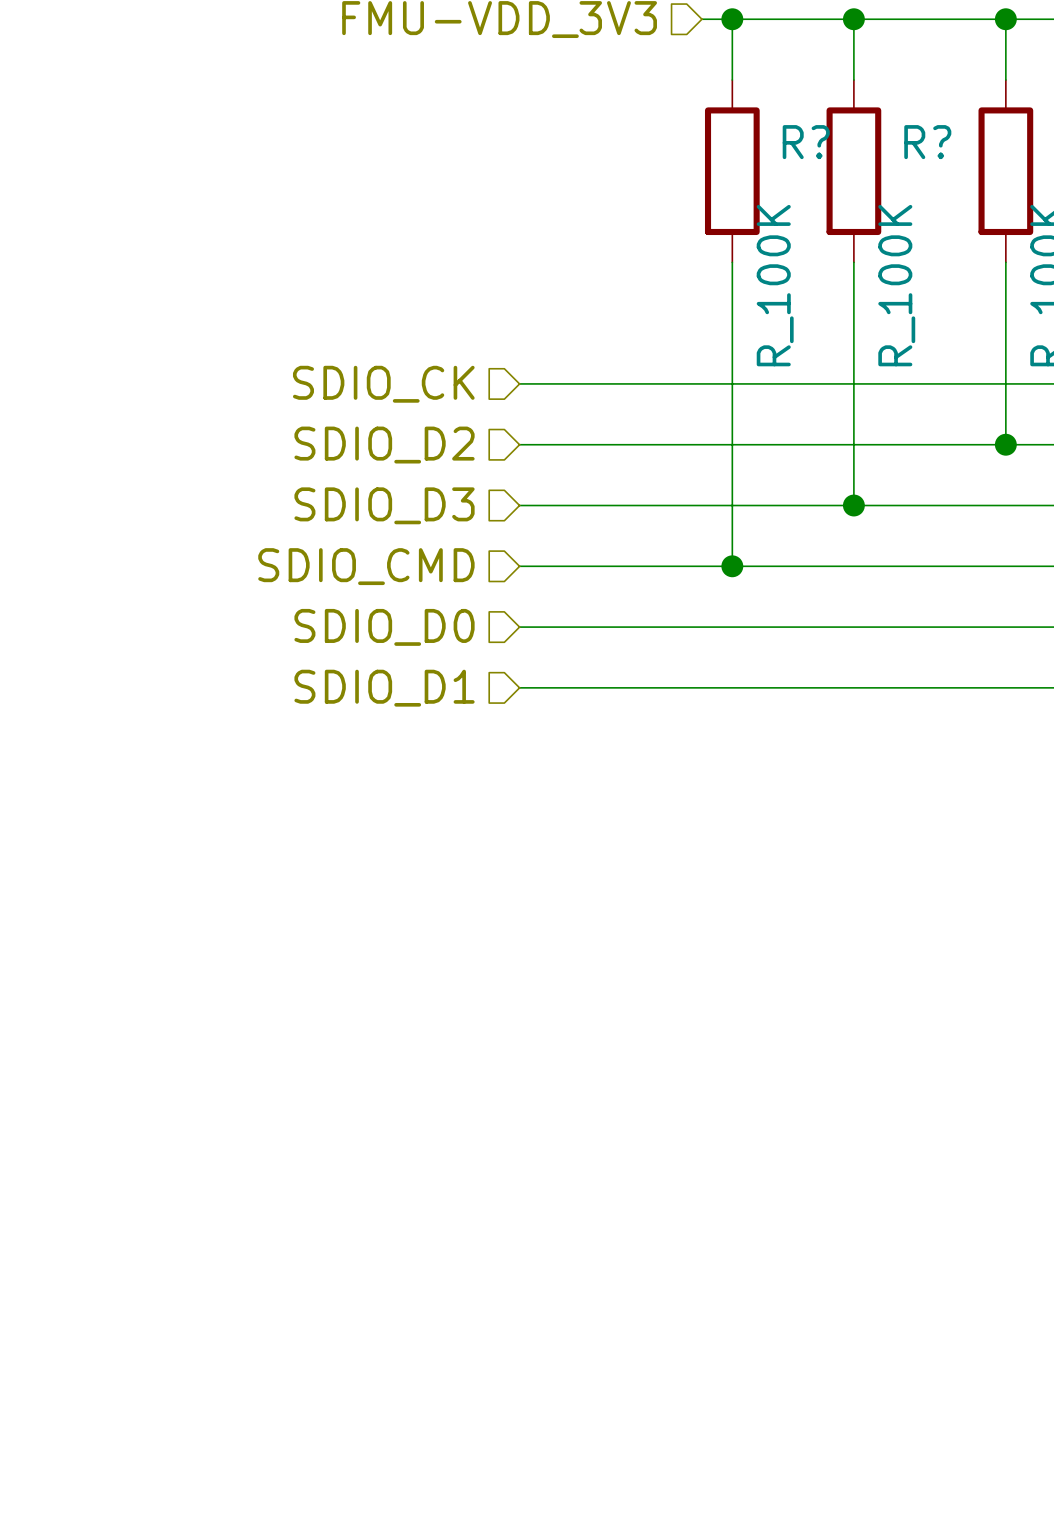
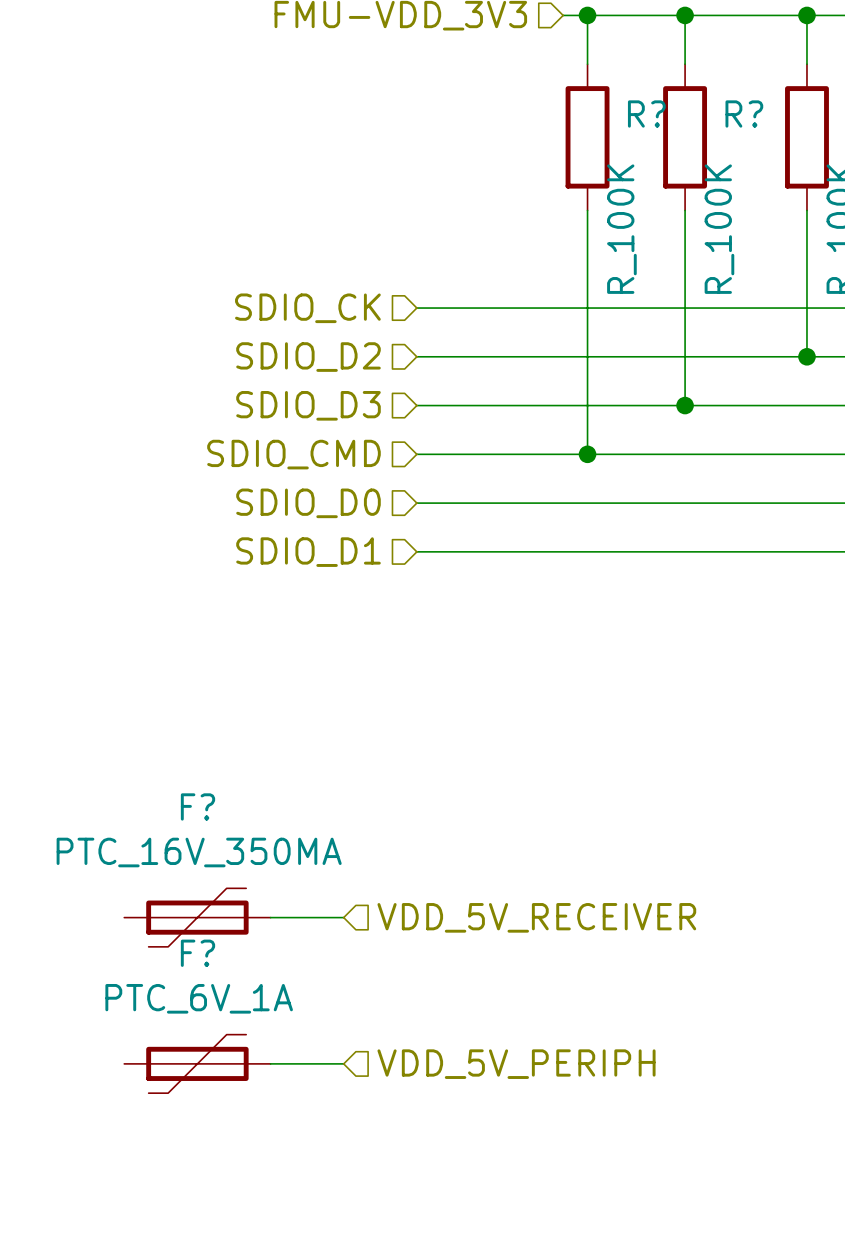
F?: none -> PTC_16V_350MA (197, 917)
wire: none -> (270, 917) (343, 917)
hierarchical label: none -> VDD_5V_RECEIVER (536, 917)
F?: none -> PTC_6V_1A (197, 1063)
wire: none -> (270, 1063) (343, 1063)
hierarchical label: none -> VDD_5V_PERIPH (516, 1064)

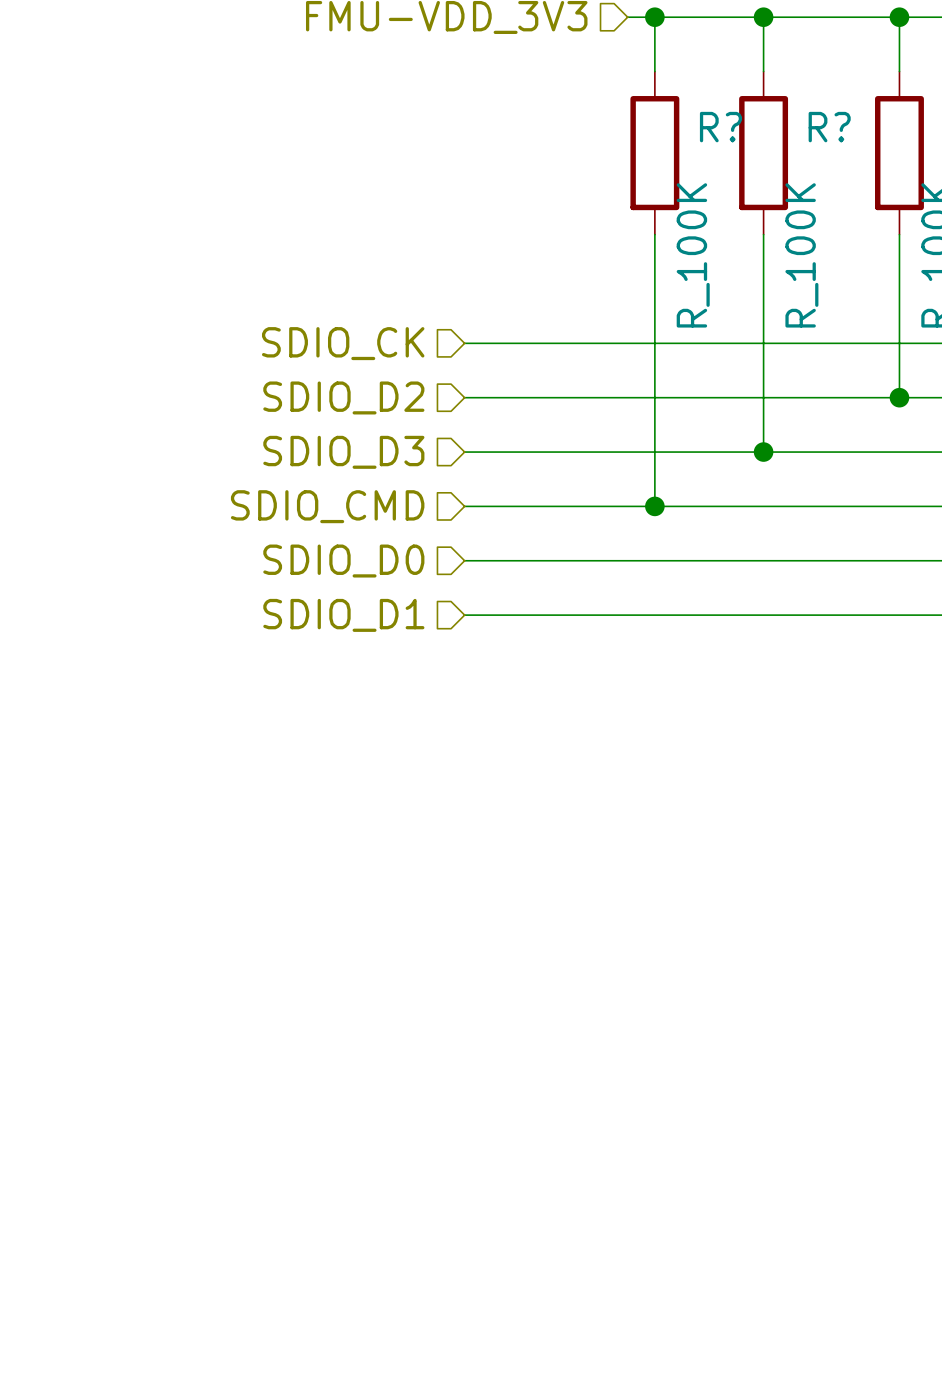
F?: PTC_16V_350MA (197, 917) -> none
wire: (270, 917) (343, 917) -> none
hierarchical label: VDD_5V_RECEIVER (536, 917) -> none
F?: PTC_6V_1A (197, 1063) -> none
wire: (270, 1063) (343, 1063) -> none
hierarchical label: VDD_5V_PERIPH (516, 1064) -> none

